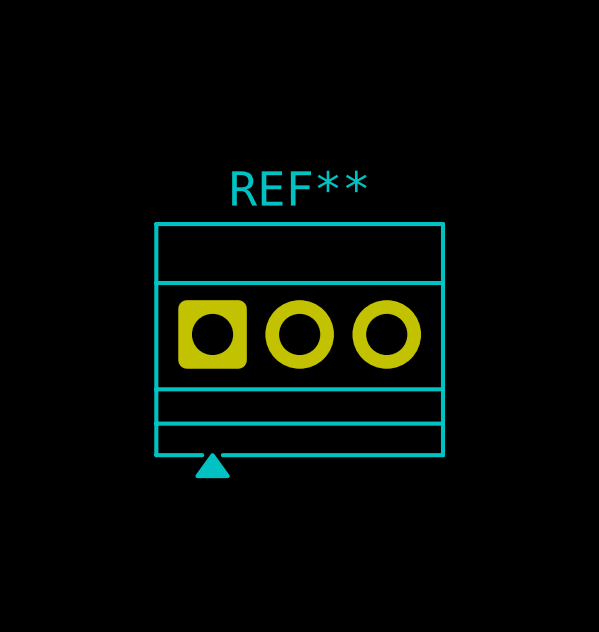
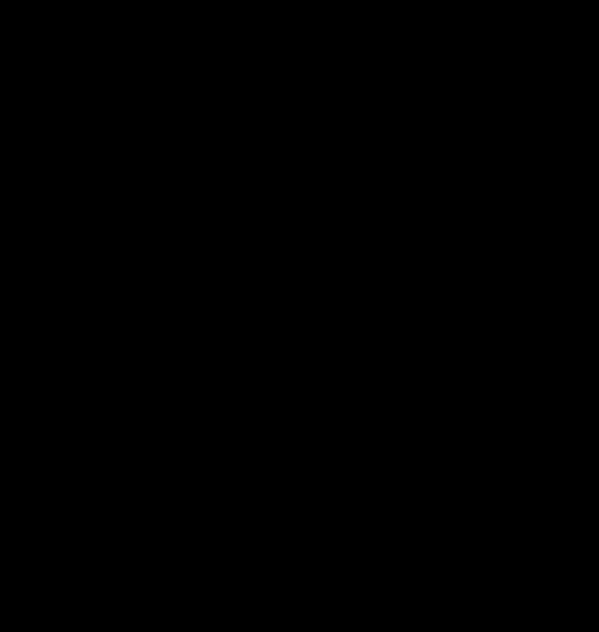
REF**: (299, 350) -> none

